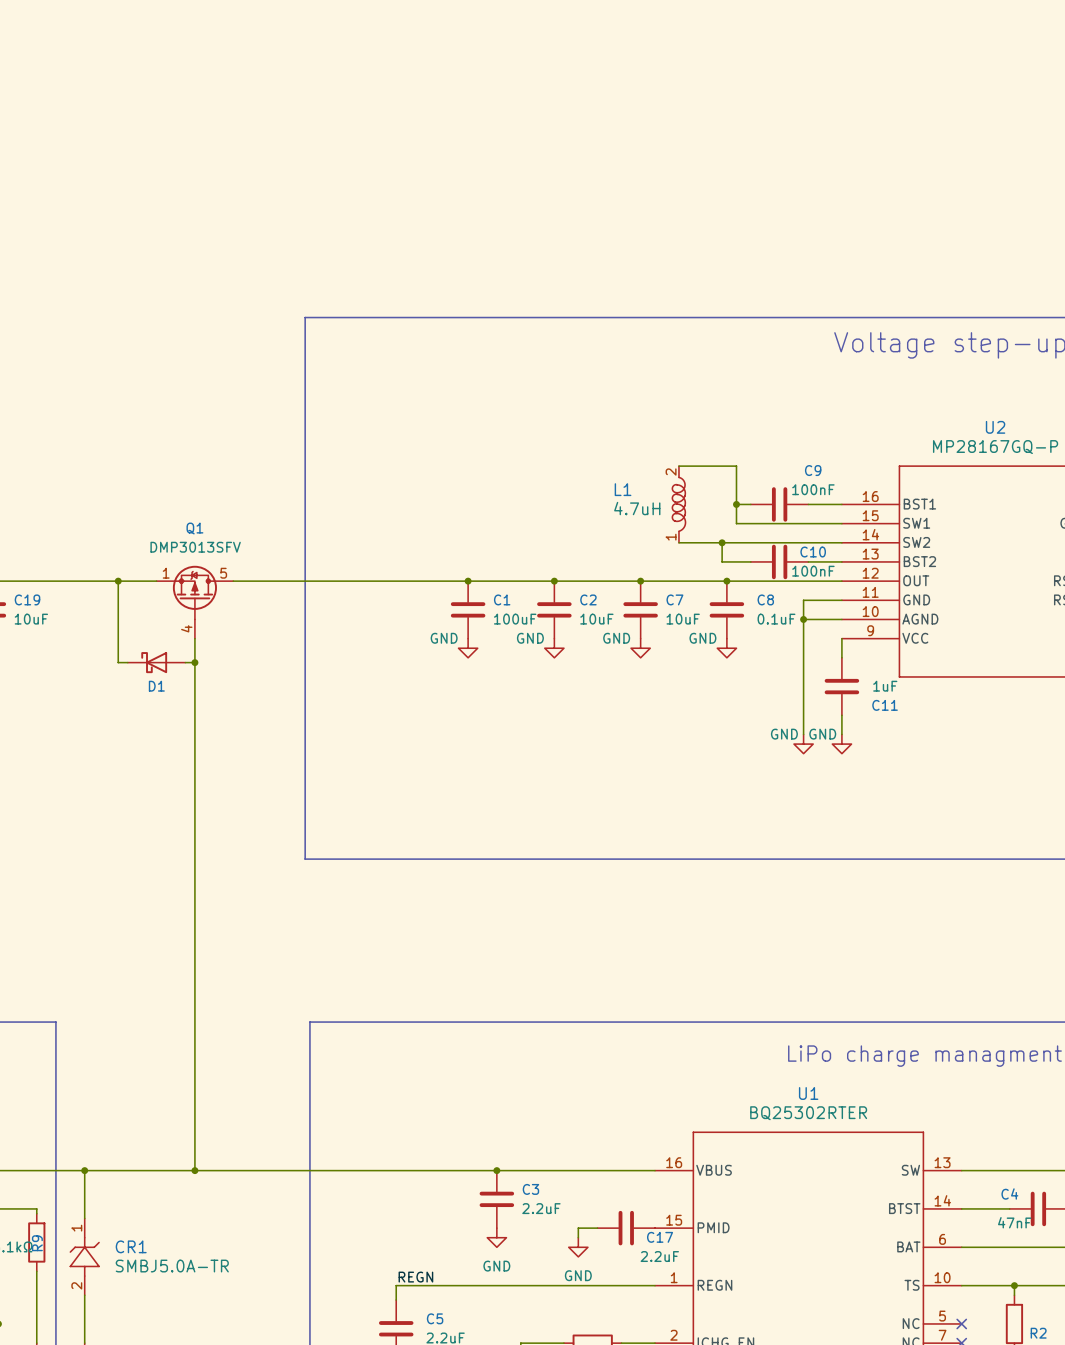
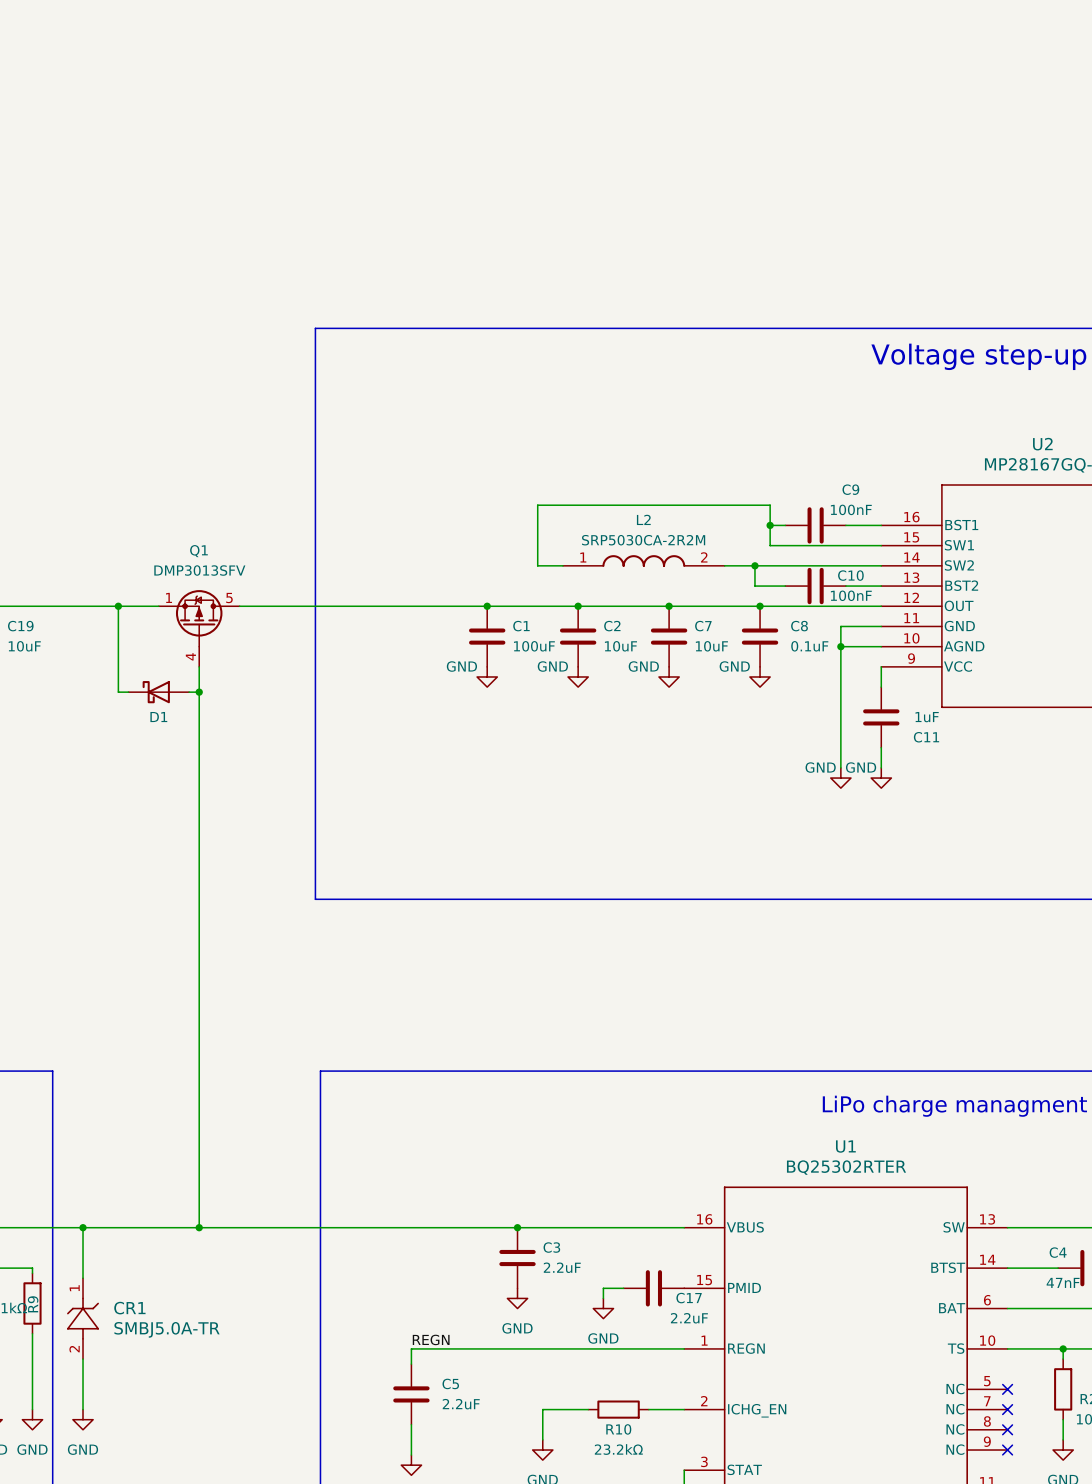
wire: (678, 466) (736, 466) (736, 485) -> (562, 565) (537, 565) (537, 505) (770, 505)
L1: 4.7uH (678, 504) -> none
L2: none -> SRP5030CA-2R2M (643, 560)

